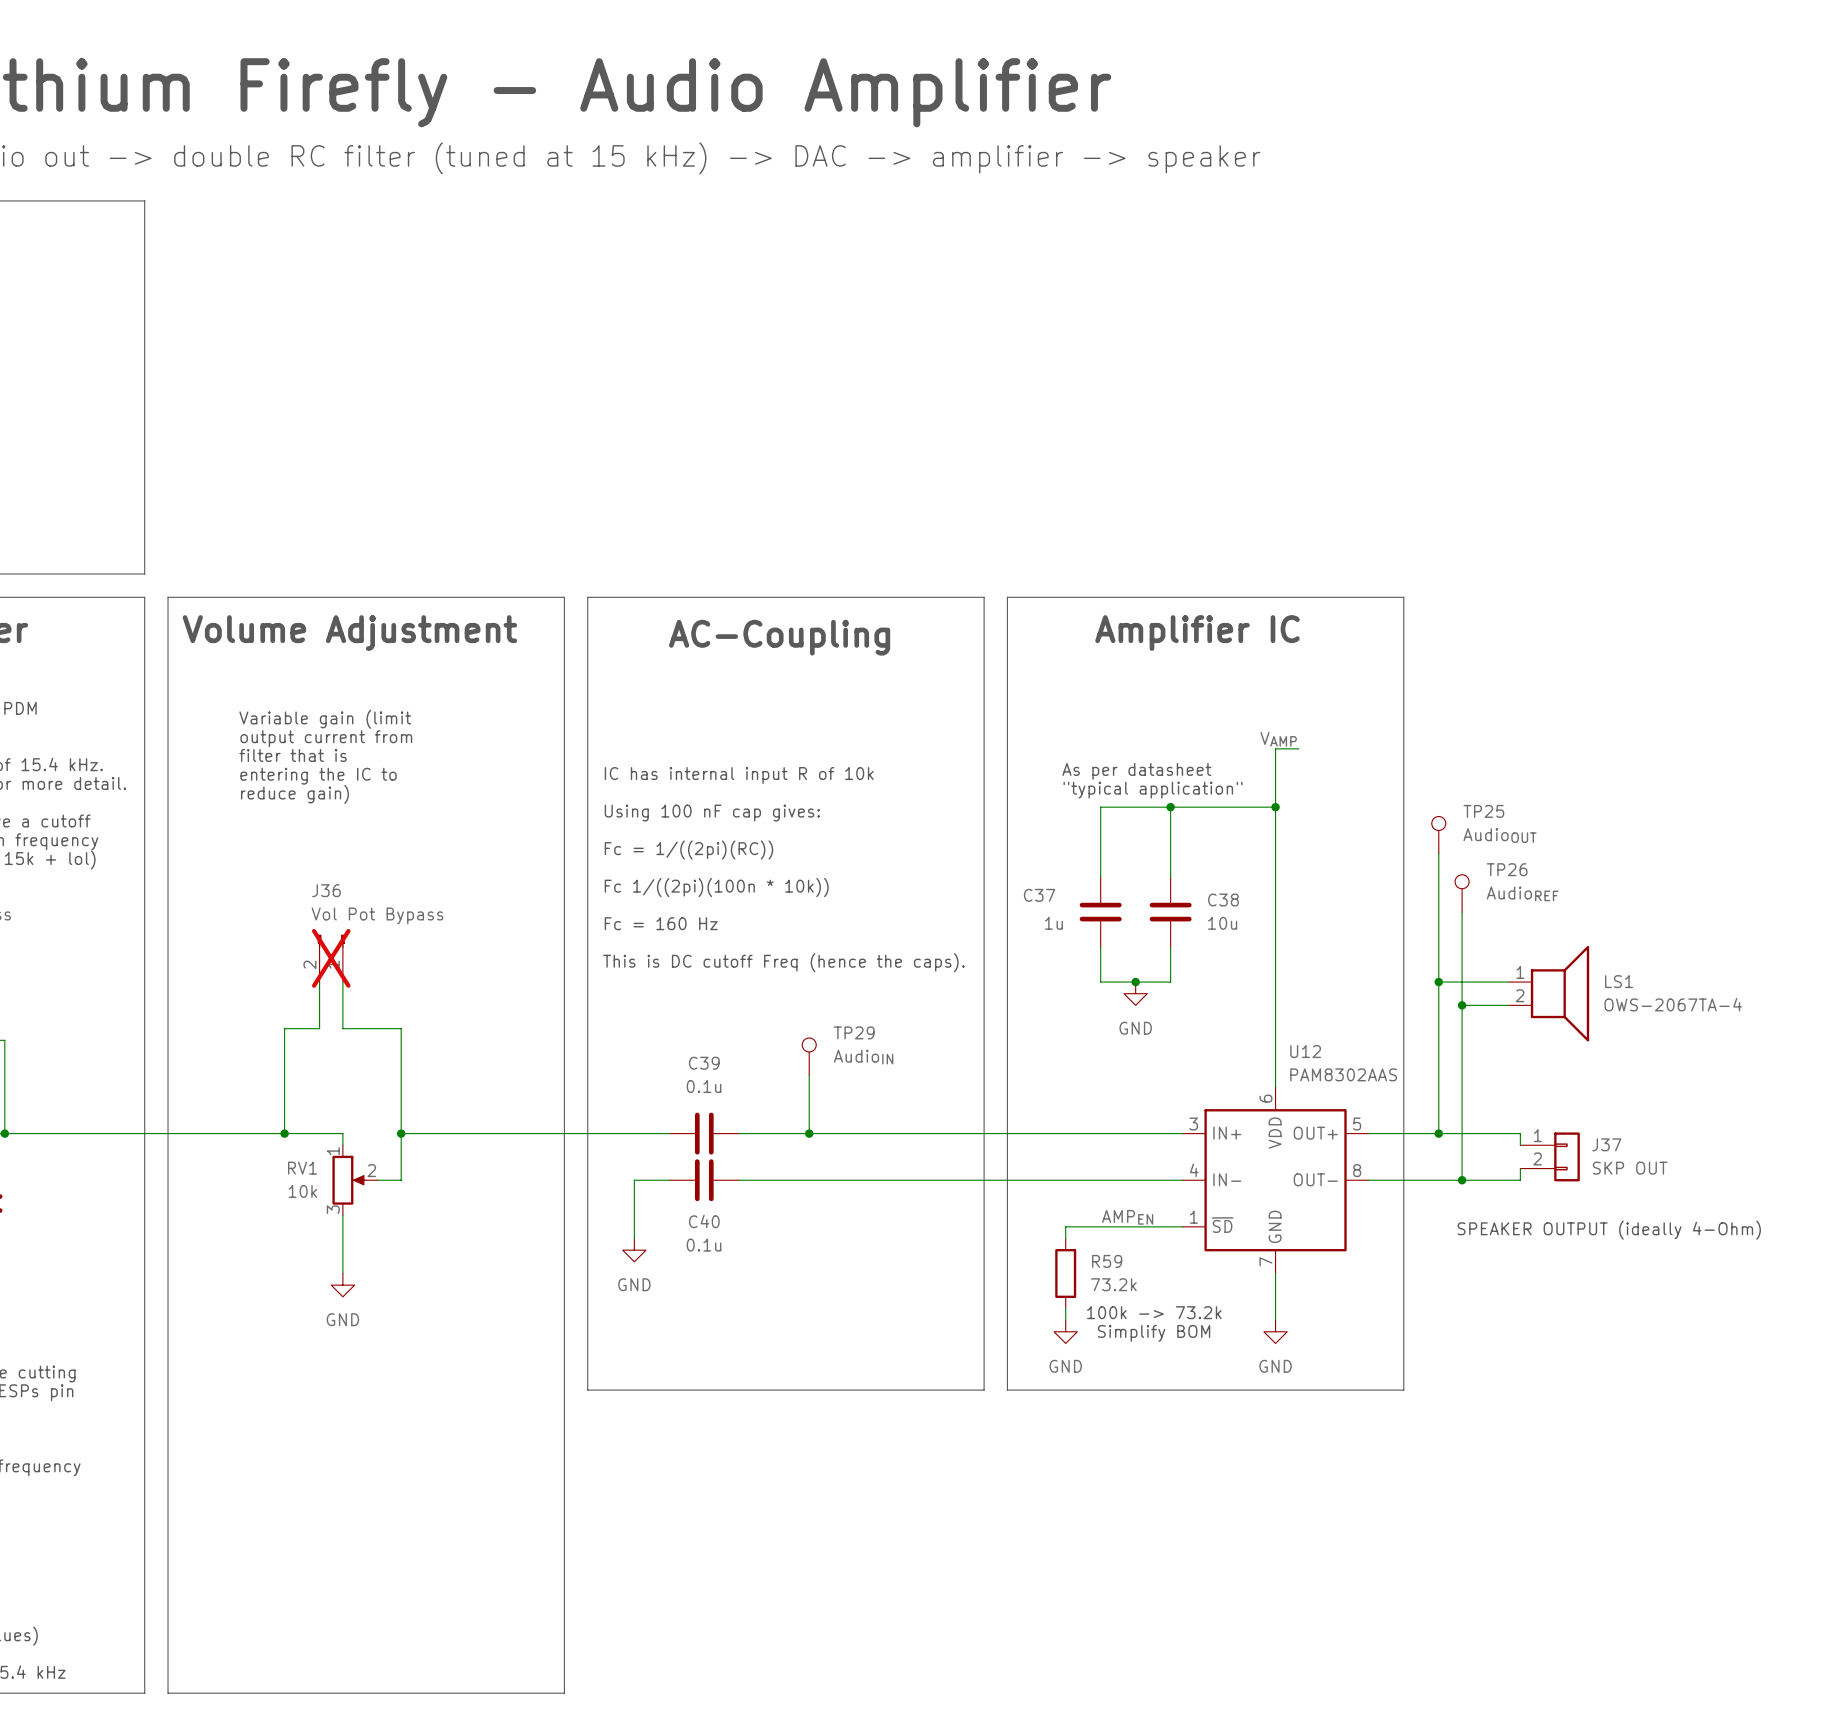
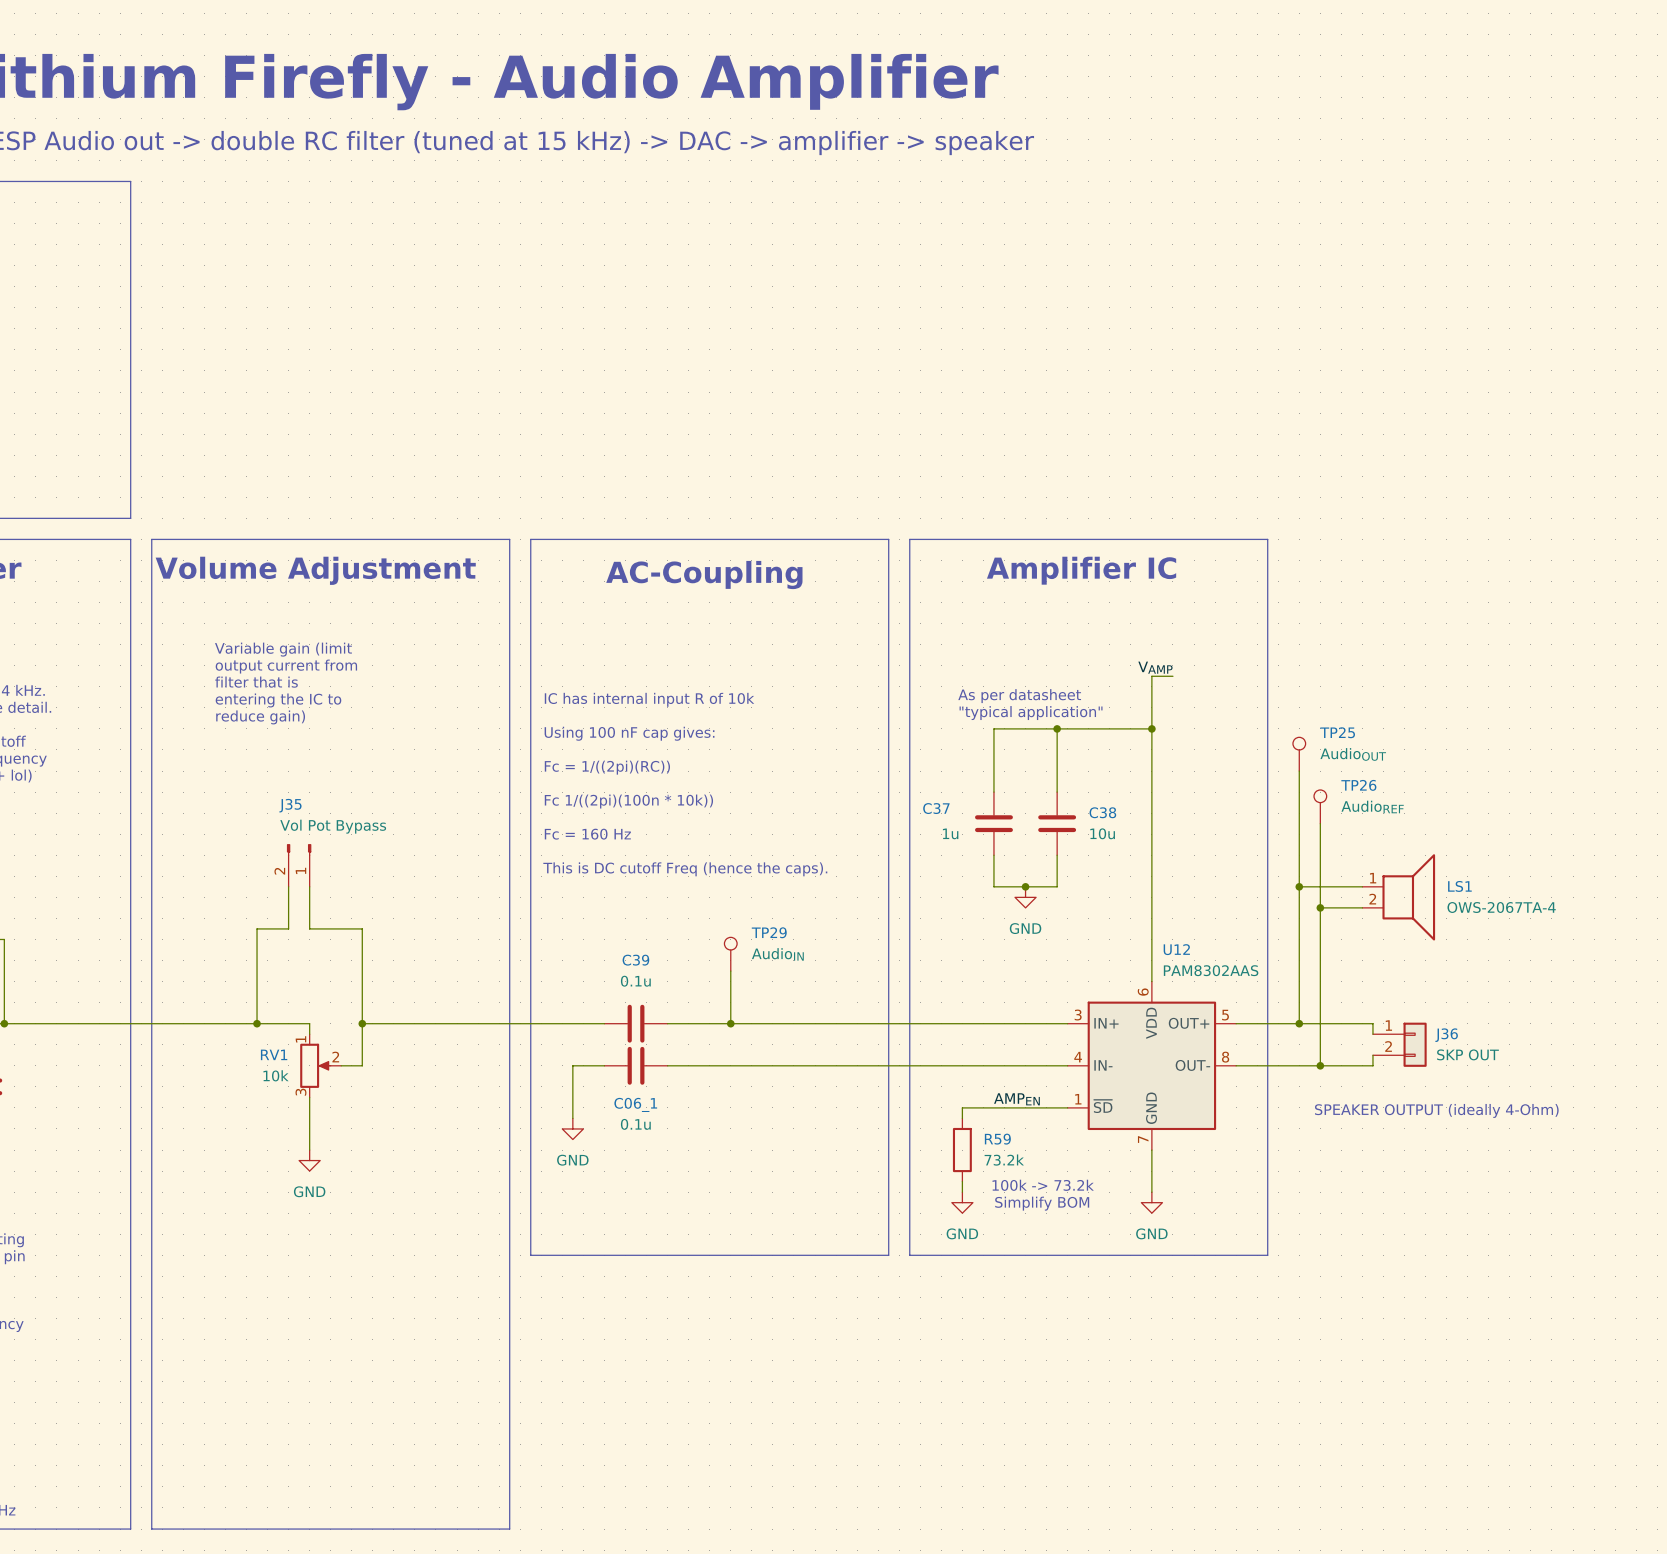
J36 name: J36 (326, 890) -> J35 (290, 805)
J36 do-not-place cross: (331, 958) -> none
J37 name: J37 (1606, 1144) -> J36 (1446, 1035)
C40 name: C40 (704, 1221) -> C06_1 (635, 1104)

